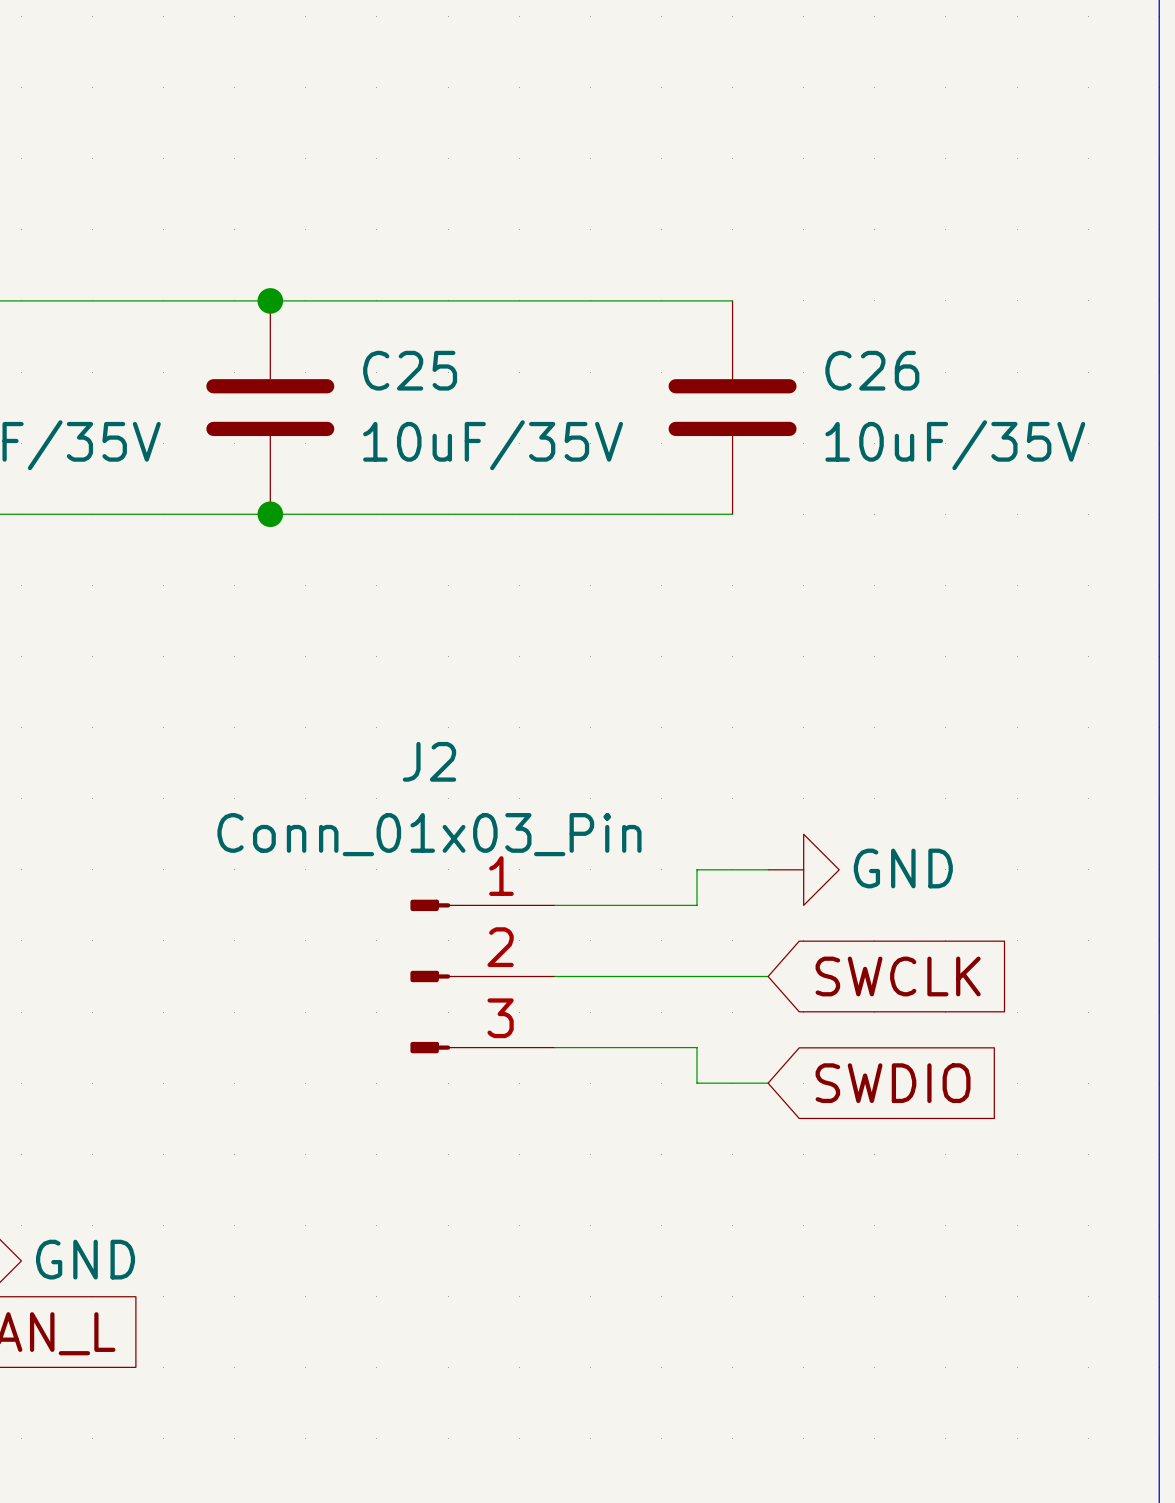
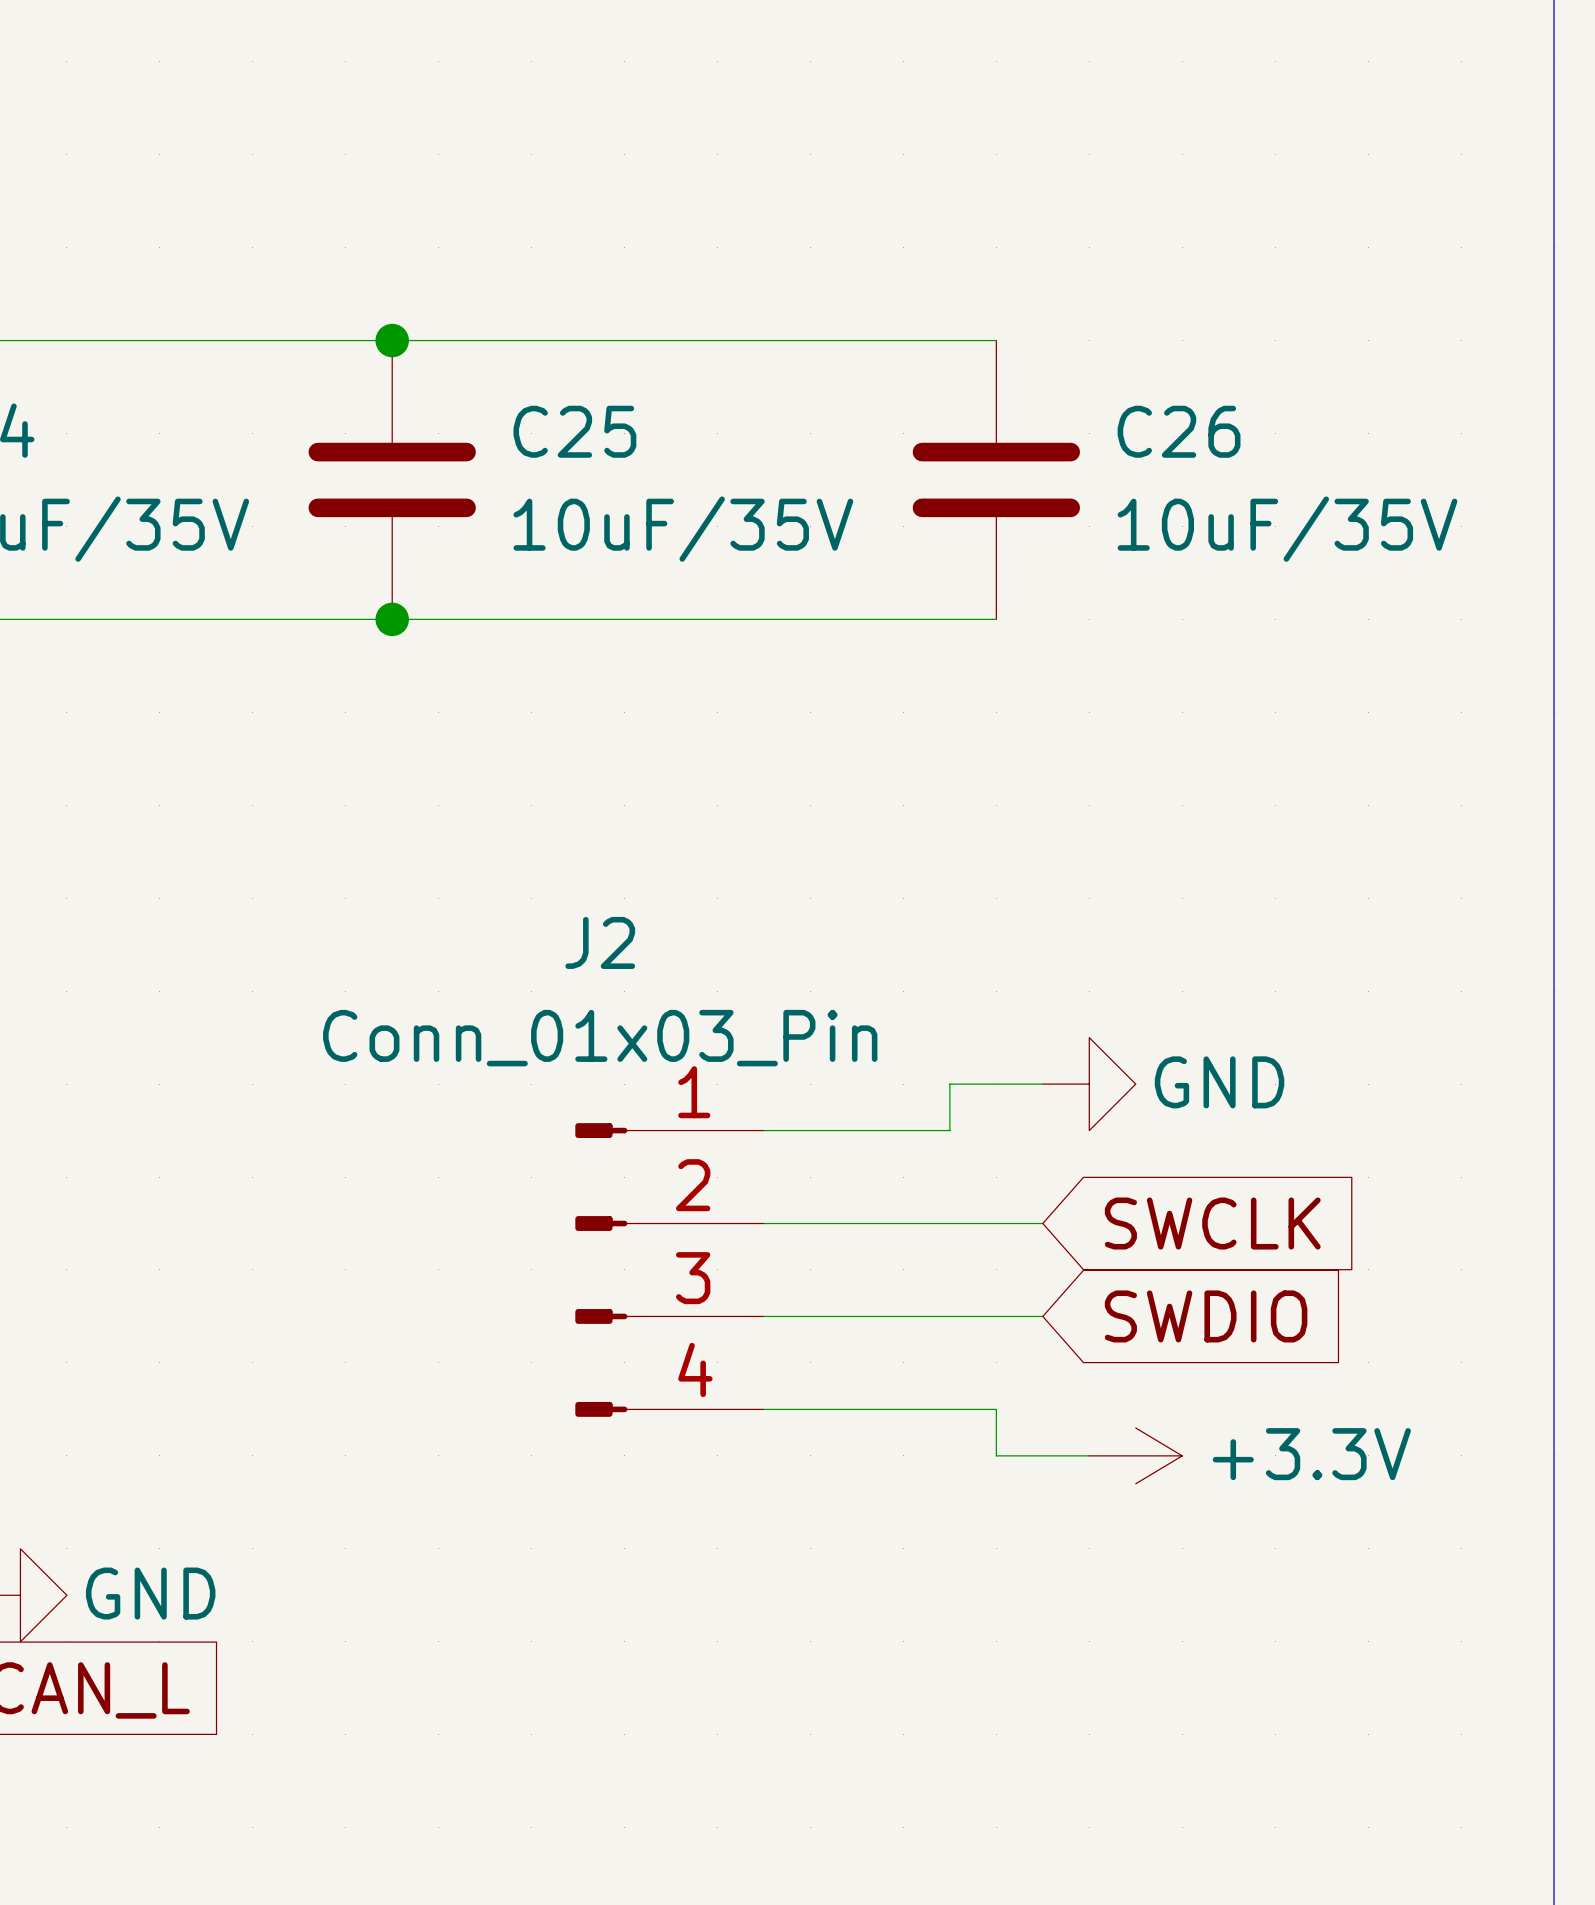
J2 symbol: [410, 899, 555, 1054] -> [575, 1123, 764, 1417]
wire: (697, 1047) (697, 1083) (768, 1083) -> (949, 1316) (1042, 1316)
global label position: SWDIO (893, 1083) -> SWDIO (1206, 1316)
wire: none -> (763, 1409) (996, 1409) (996, 1455) (1089, 1455)
power symbol: none -> +3.3V (1135, 1455)

